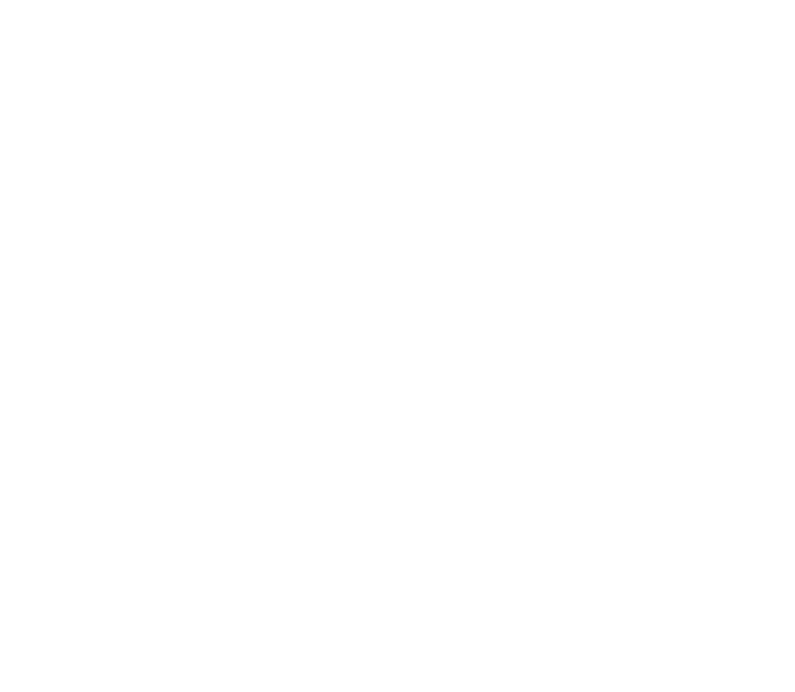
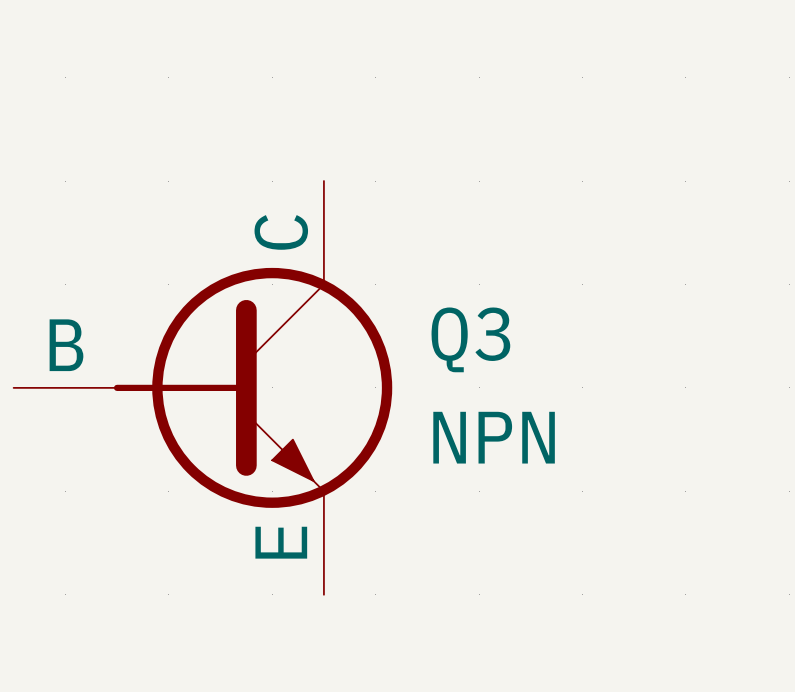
Q3: none -> NPN (202, 387)

